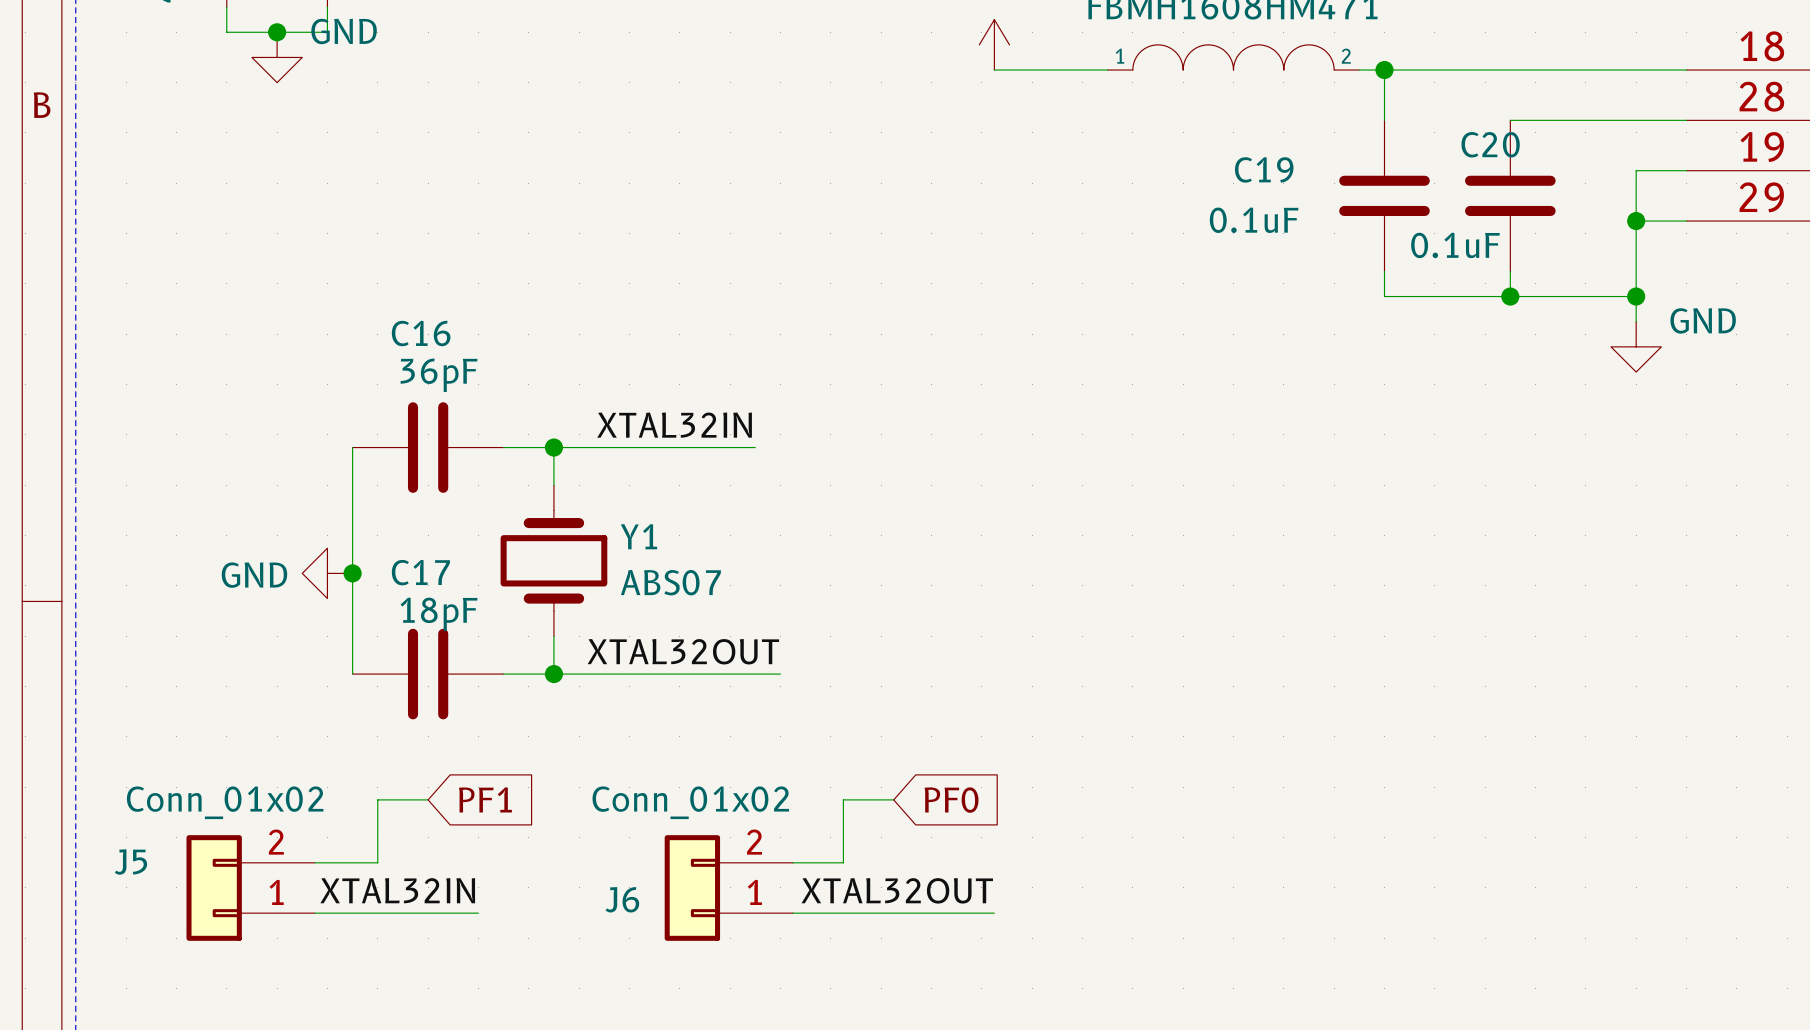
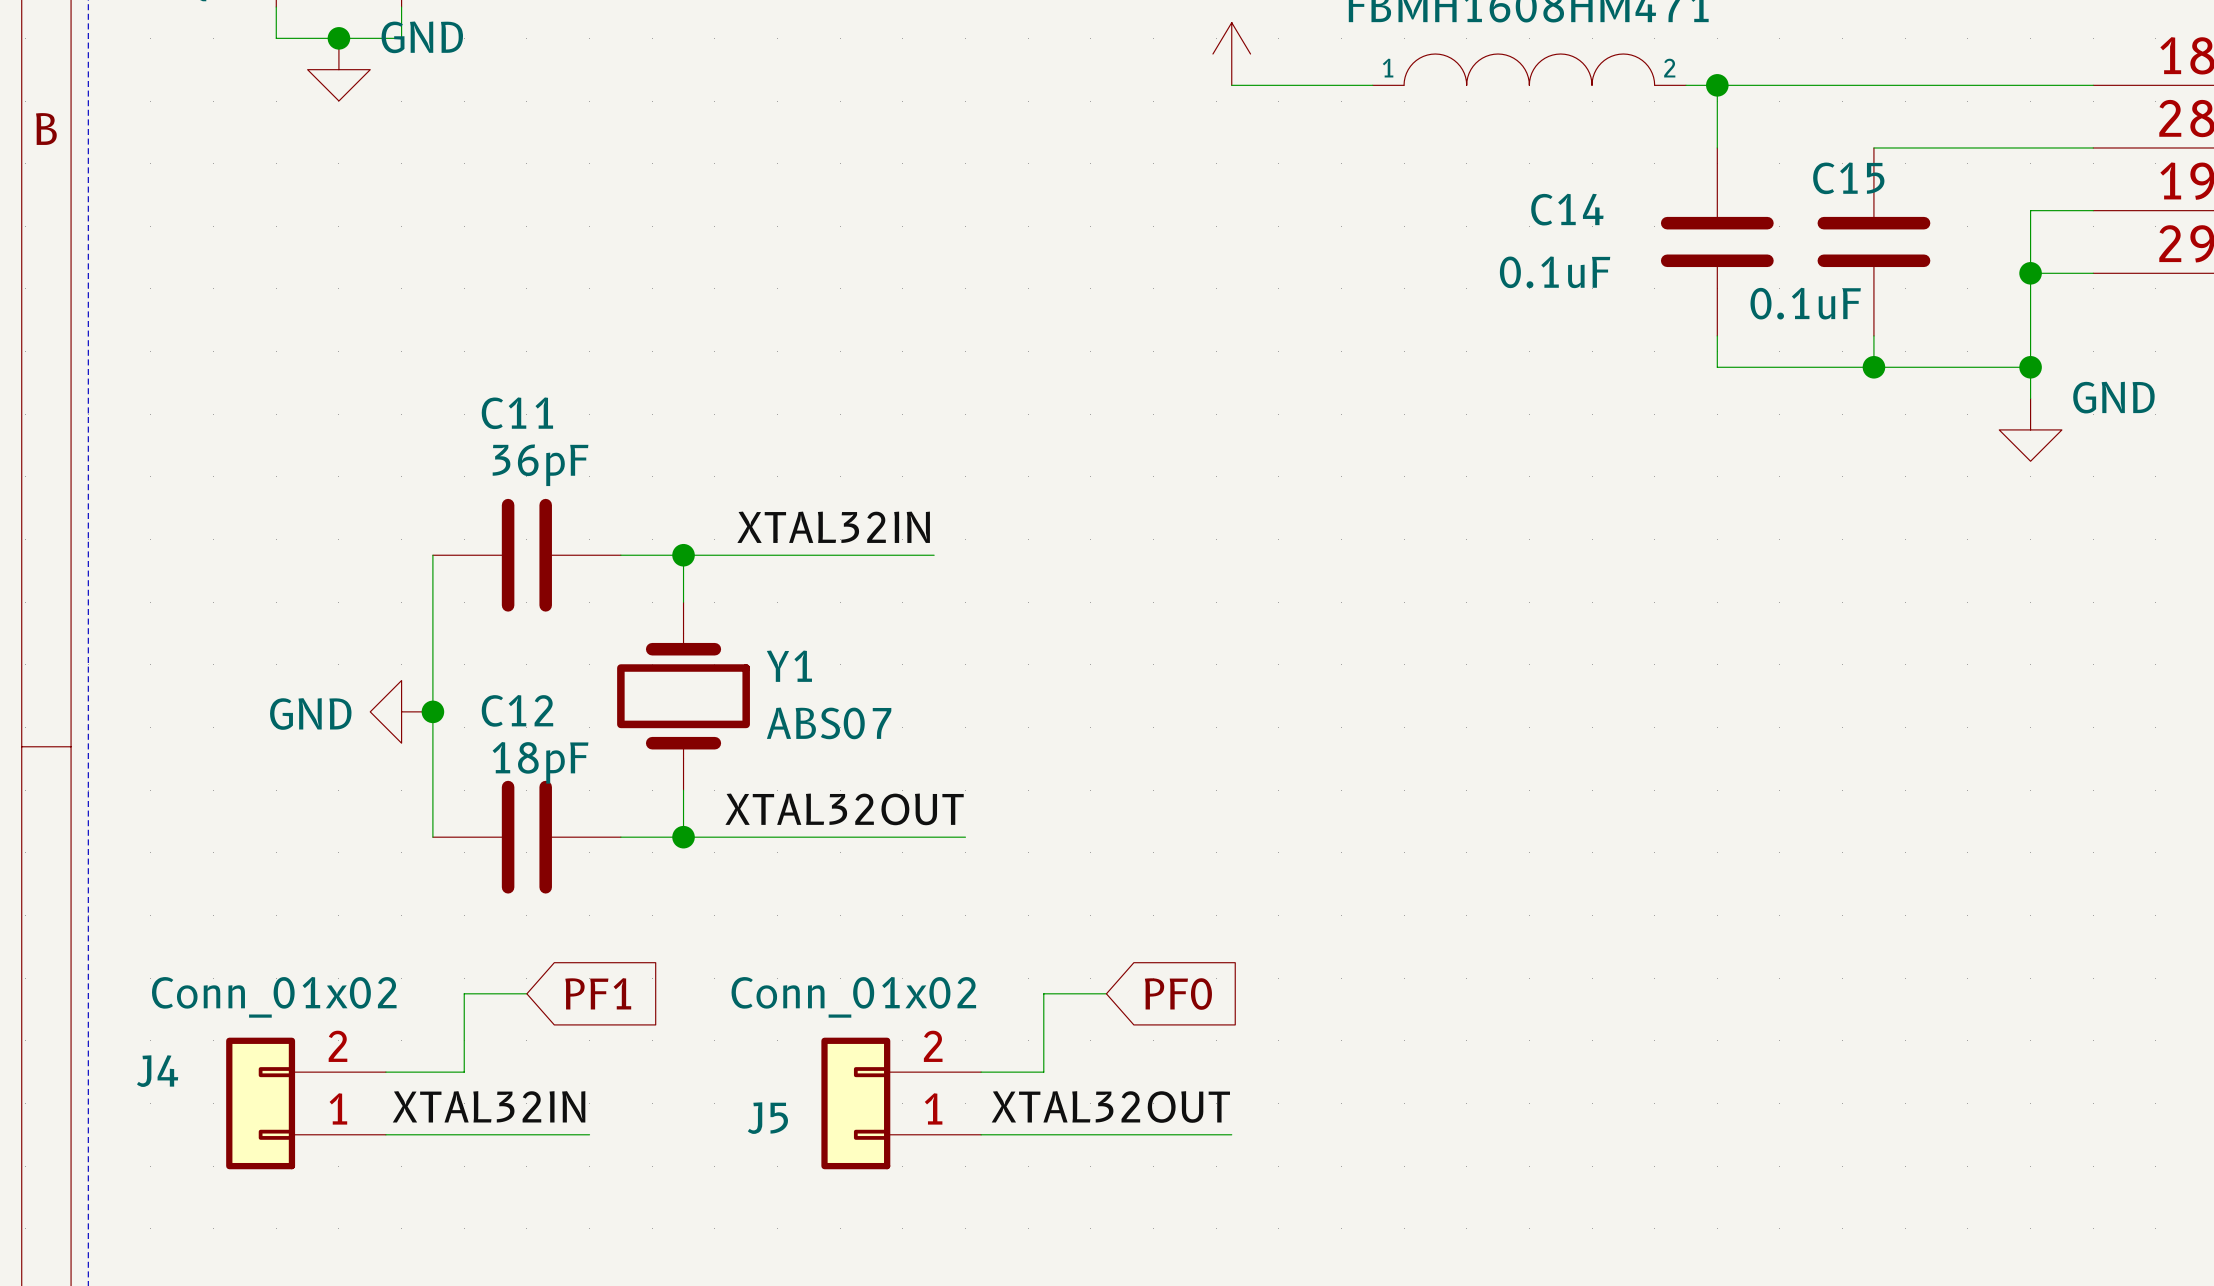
C20 name: C20 (1490, 144) -> C15 (1848, 178)
C19 name: C19 (1264, 169) -> C14 (1567, 209)
C16 name: C16 (421, 333) -> C11 (517, 413)
C17 name: C17 (420, 572) -> C12 (517, 710)
J5 name: J5 (130, 862) -> J4 (157, 1071)
J6 name: J6 (622, 899) -> J5 (767, 1118)

